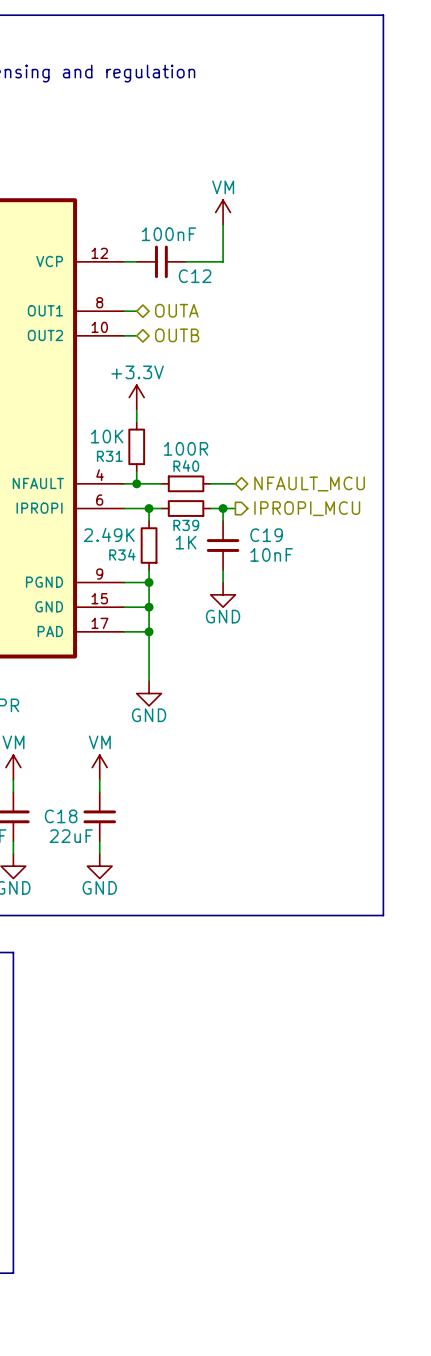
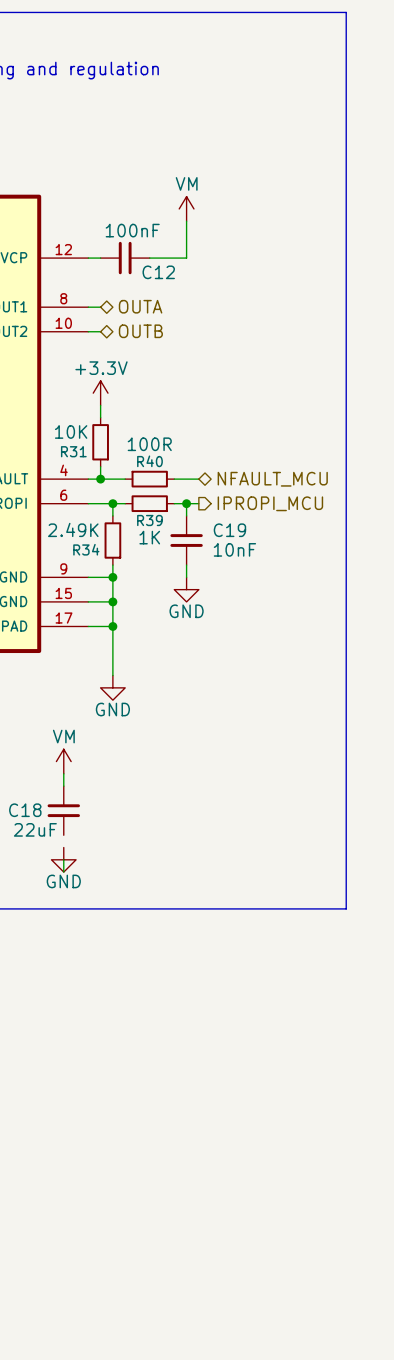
wire: (99, 841) (99, 853) -> (63, 859) (63, 872)

